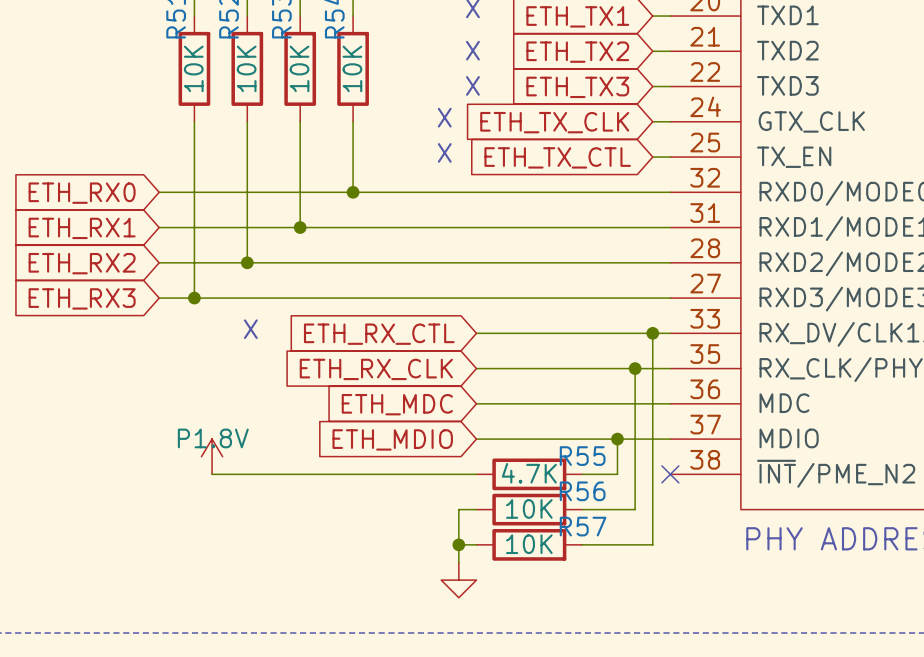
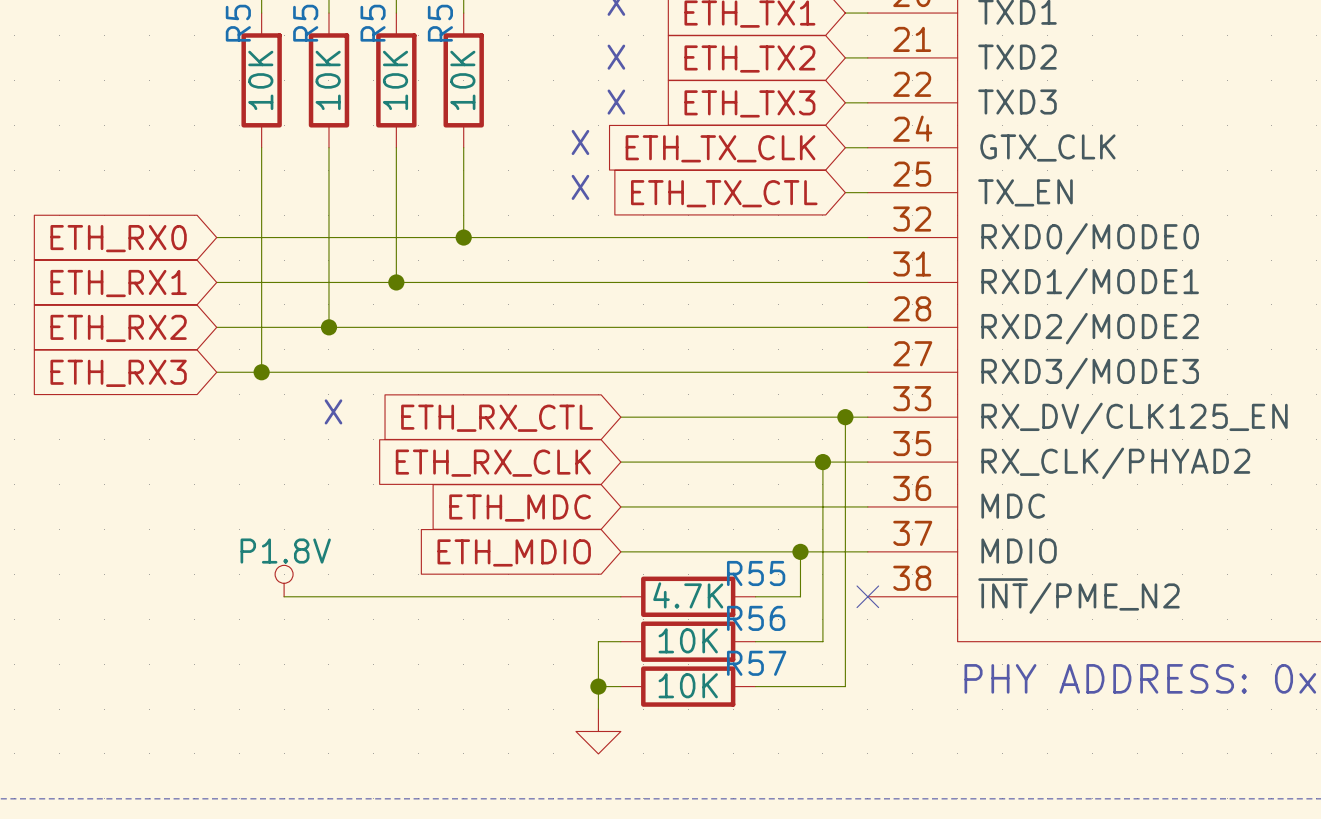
power symbol shape: [201, 439, 223, 475] -> [275, 565, 294, 597]

